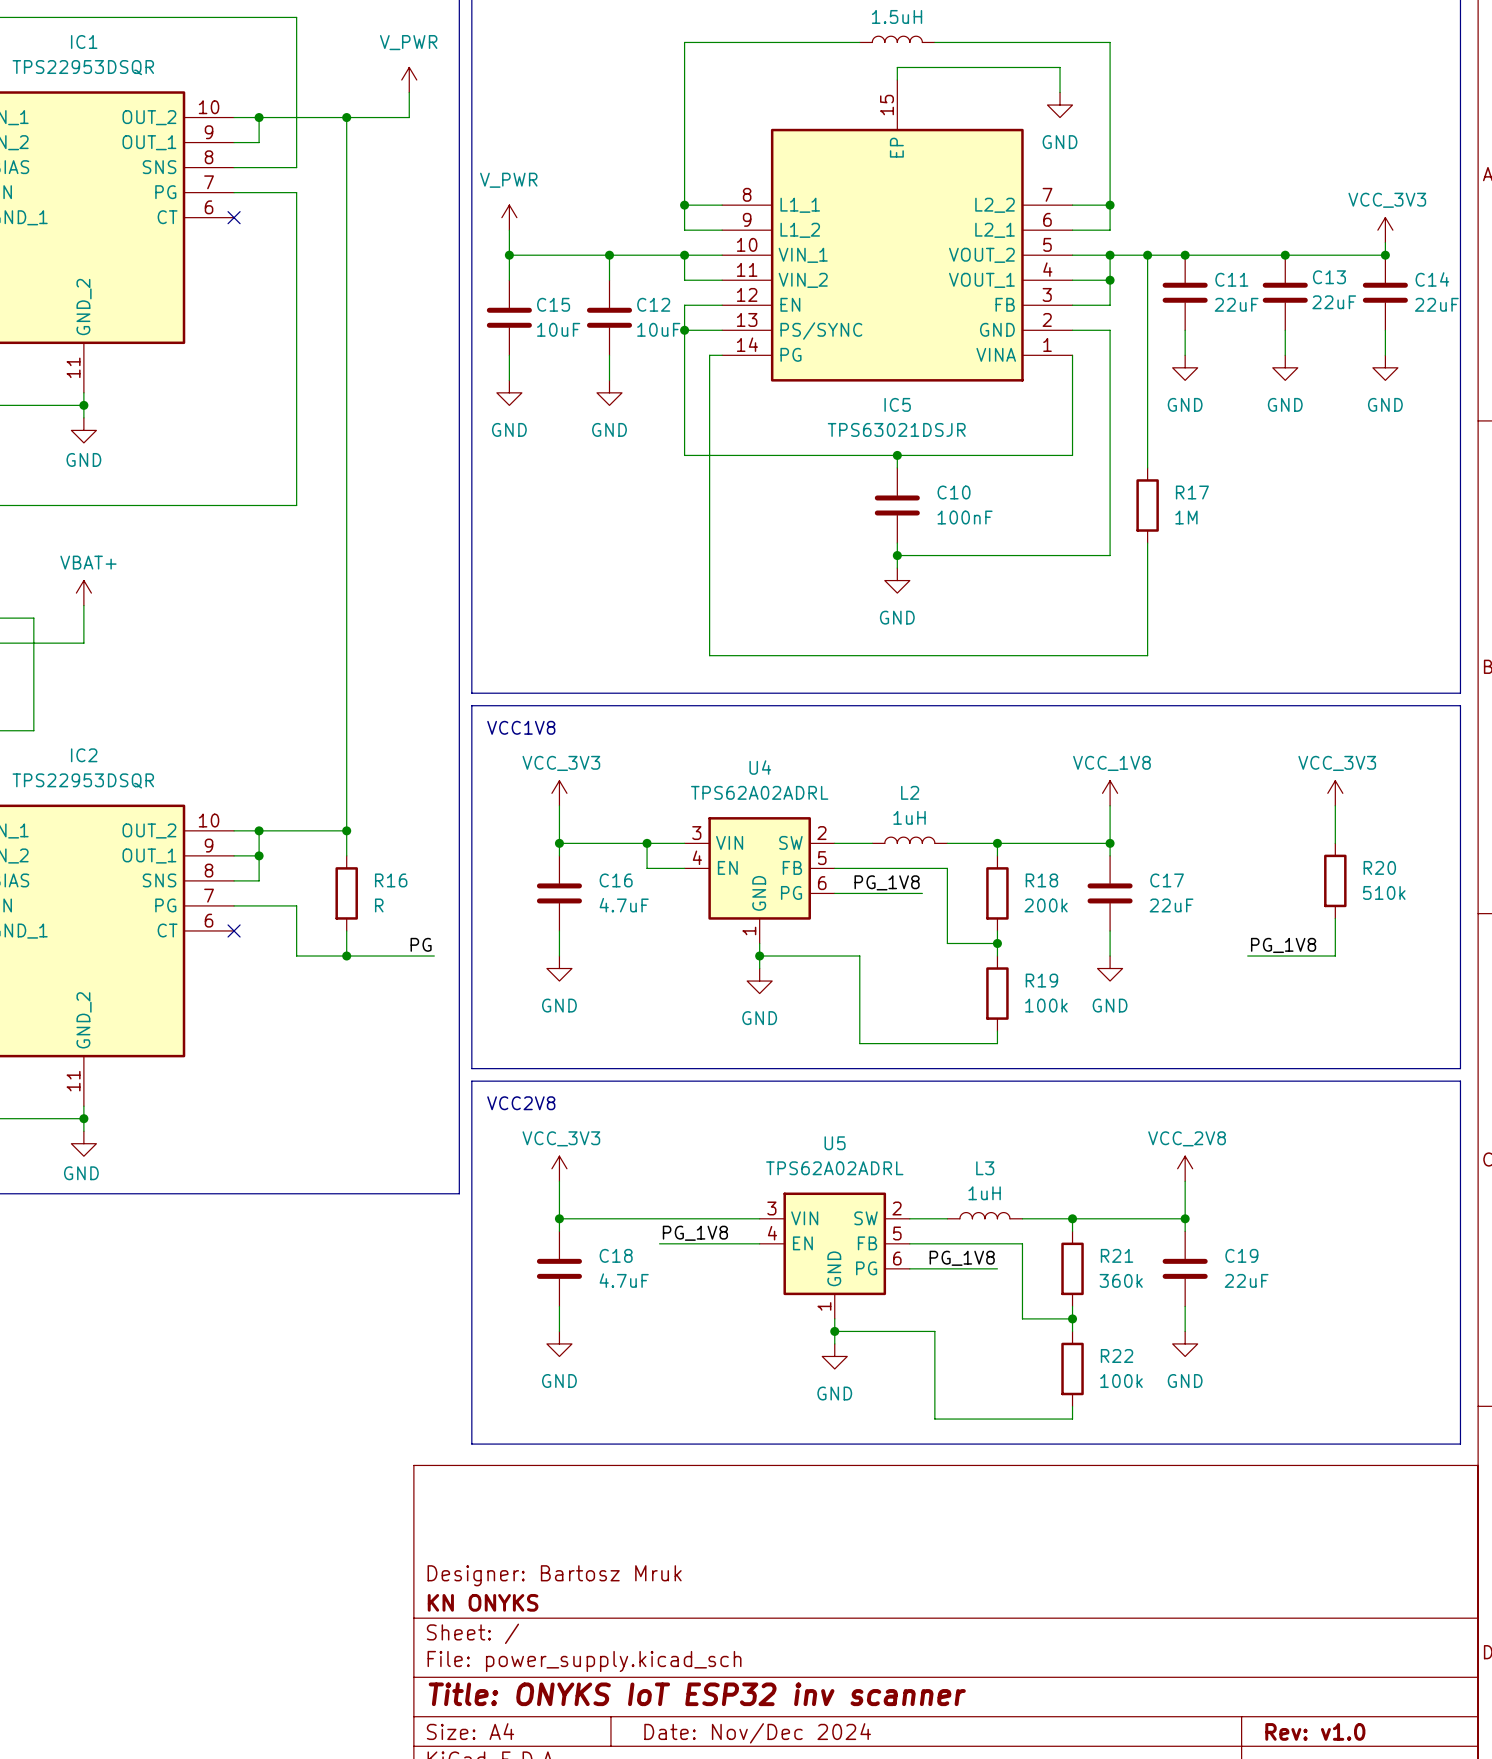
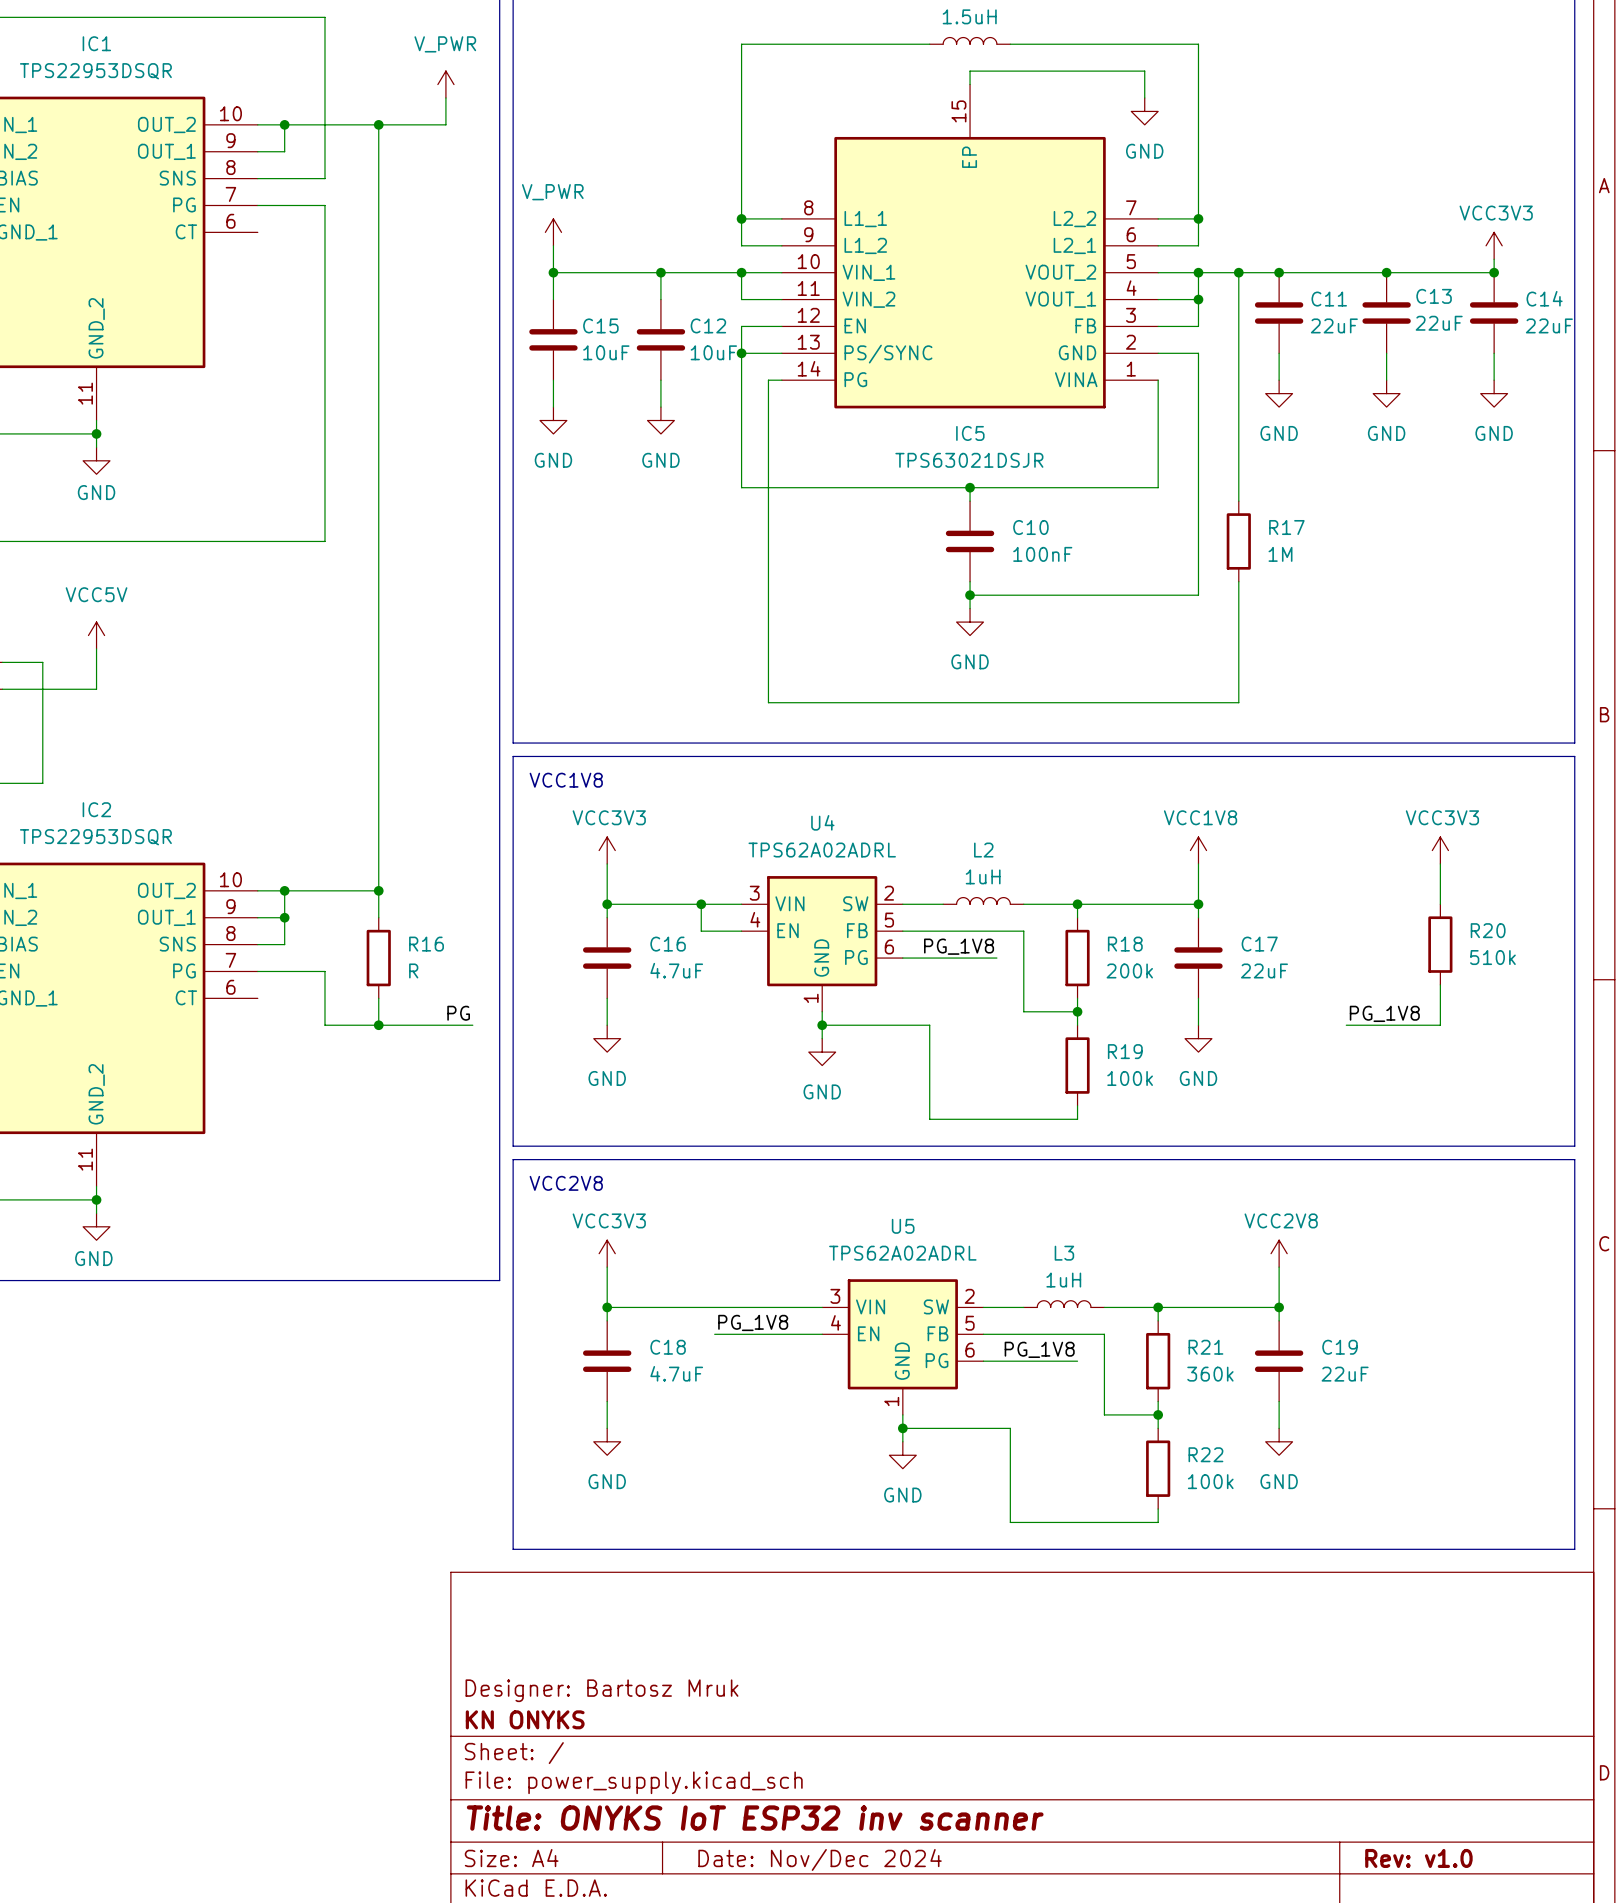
no-connect mark: (234, 217) -> none
power symbol: VCC_3V3 (1385, 230) -> VCC3V3 (1494, 245)
power symbol: VBAT+ (83, 593) -> VCC5V (96, 635)
power symbol: VCC_3V3 (559, 793) -> VCC3V3 (607, 850)
power symbol: VCC_1V8 (1110, 793) -> VCC1V8 (1198, 850)
power symbol: VCC_3V3 (1335, 793) -> VCC3V3 (1440, 850)
no-connect mark: (234, 930) -> none
power symbol: VCC_3V3 (559, 1168) -> VCC3V3 (607, 1253)
power symbol: VCC_2V8 (1185, 1168) -> VCC2V8 (1279, 1253)

